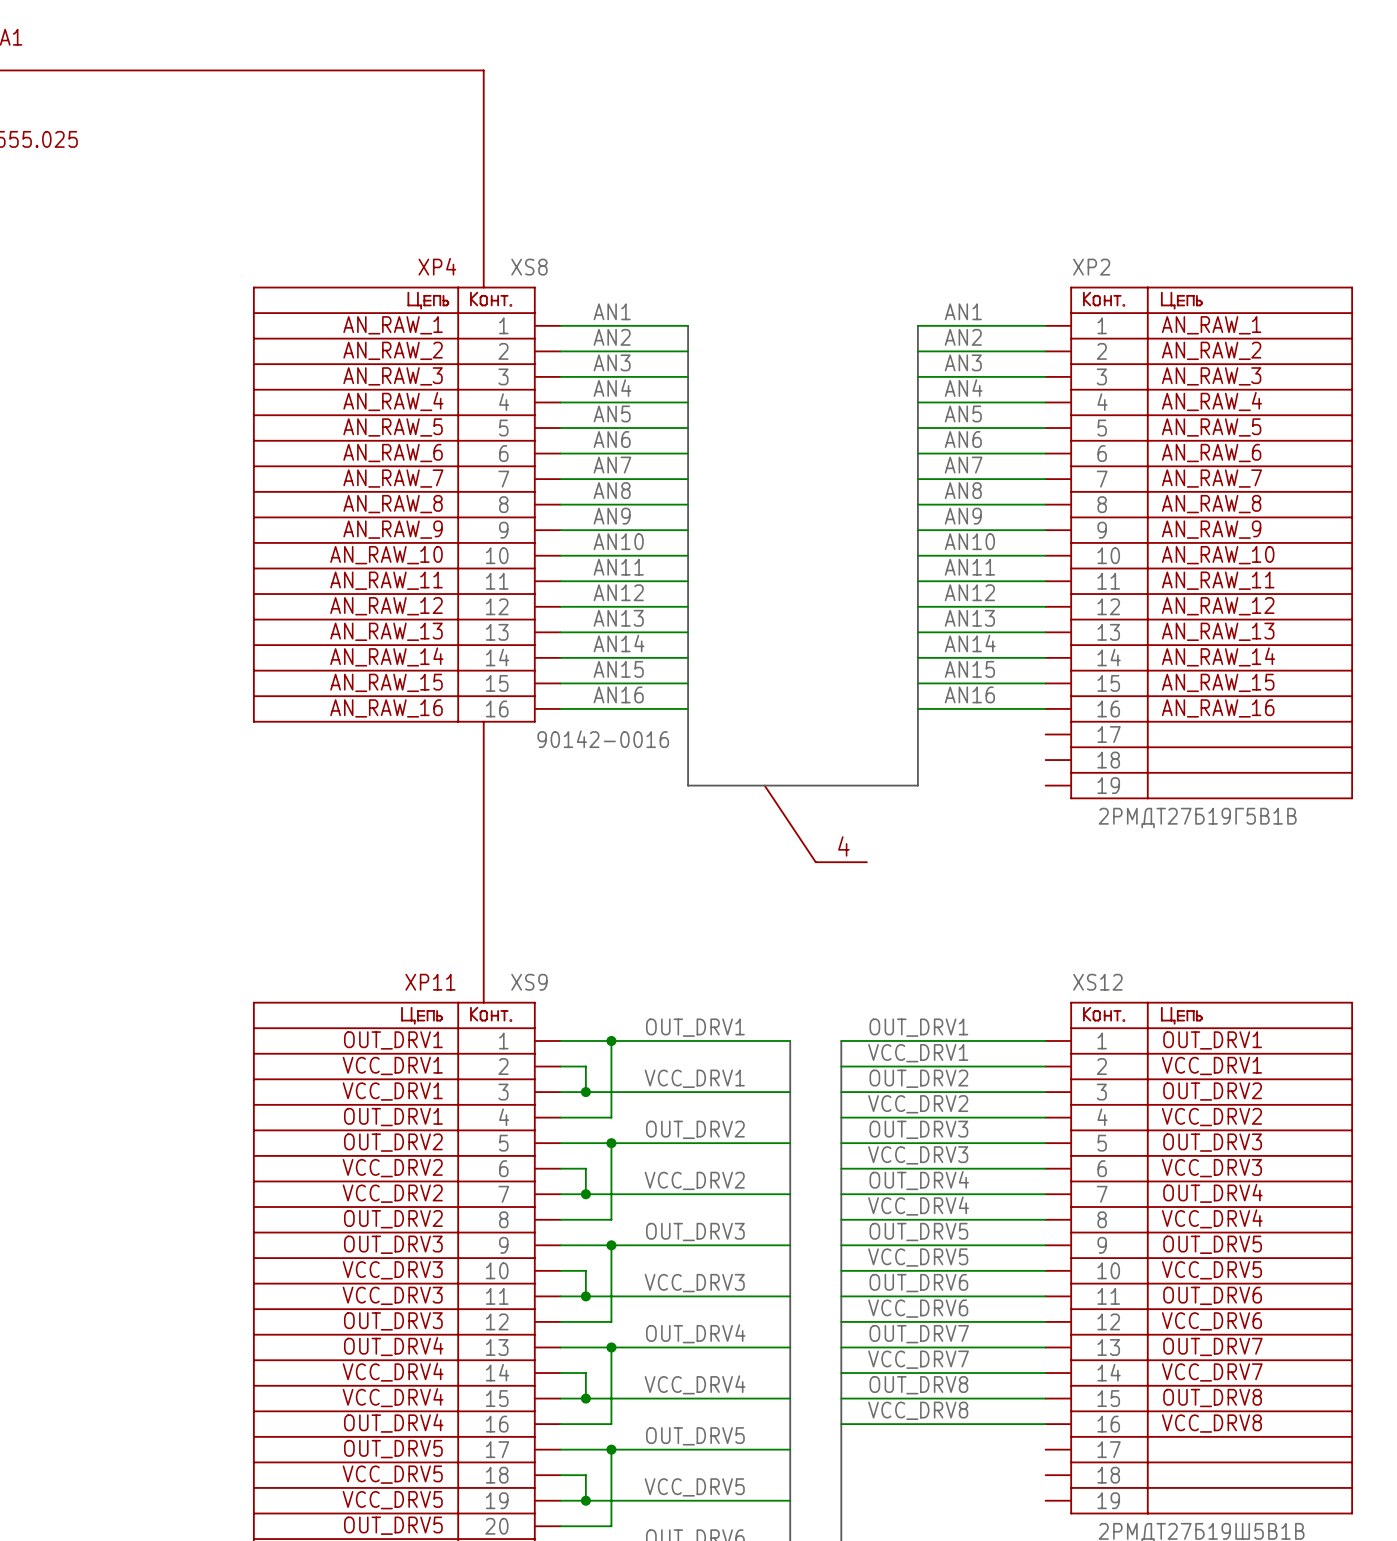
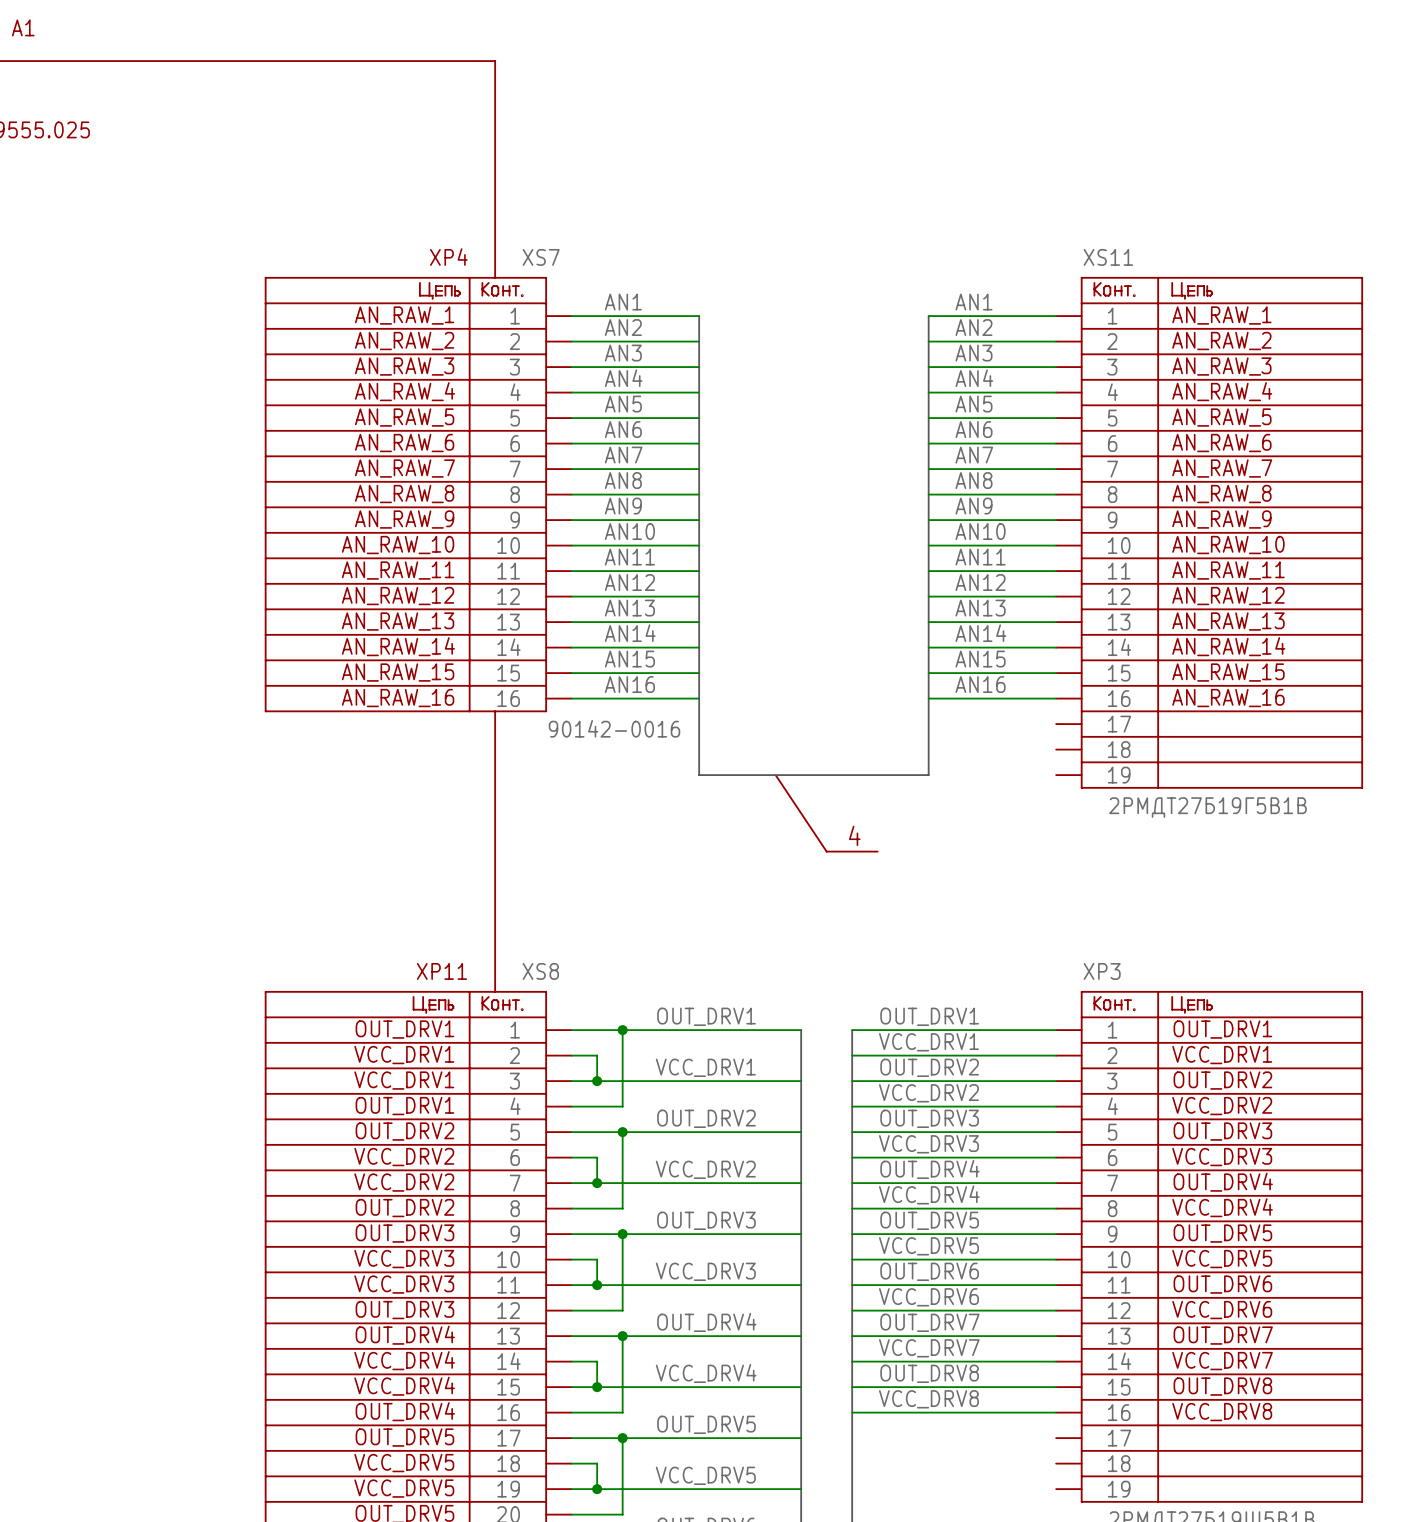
XS8 name: XS8 (529, 267) -> XS7 (541, 257)
XP2 name: XP2 (1091, 267) -> XS11 (1108, 257)
XS9 name: XS9 (529, 982) -> XS8 (540, 971)
XS12 name: XS12 (1097, 982) -> XP3 (1102, 971)

